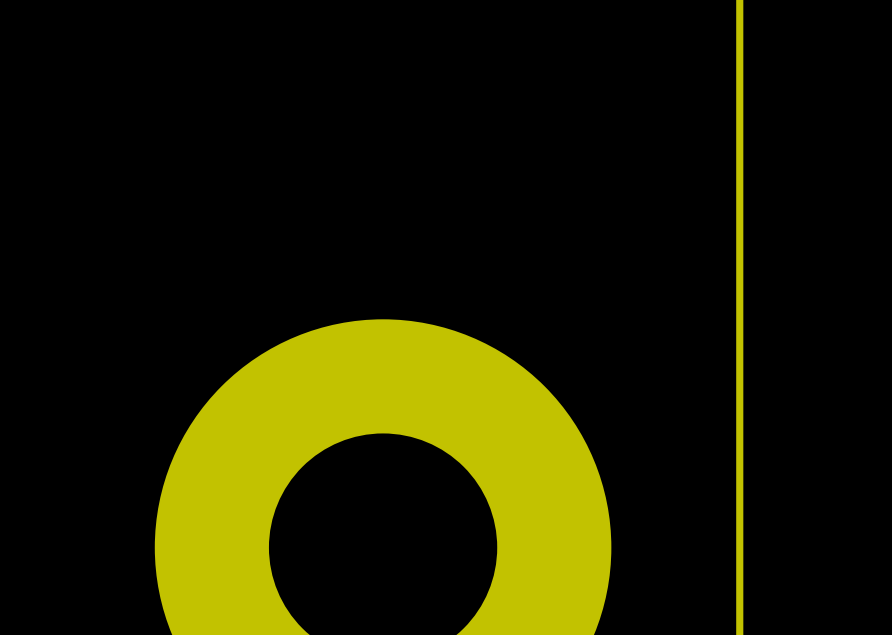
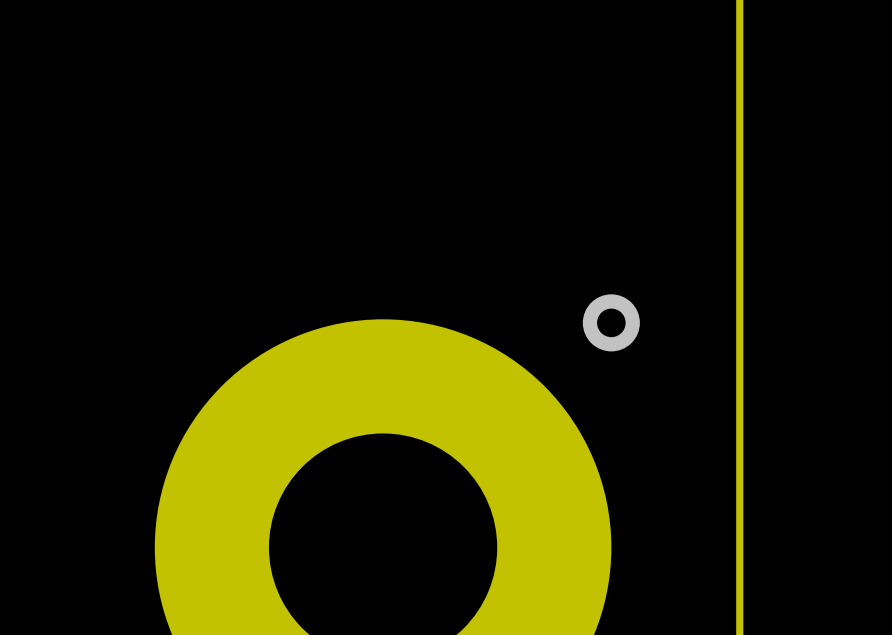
via: none -> (611, 322)

